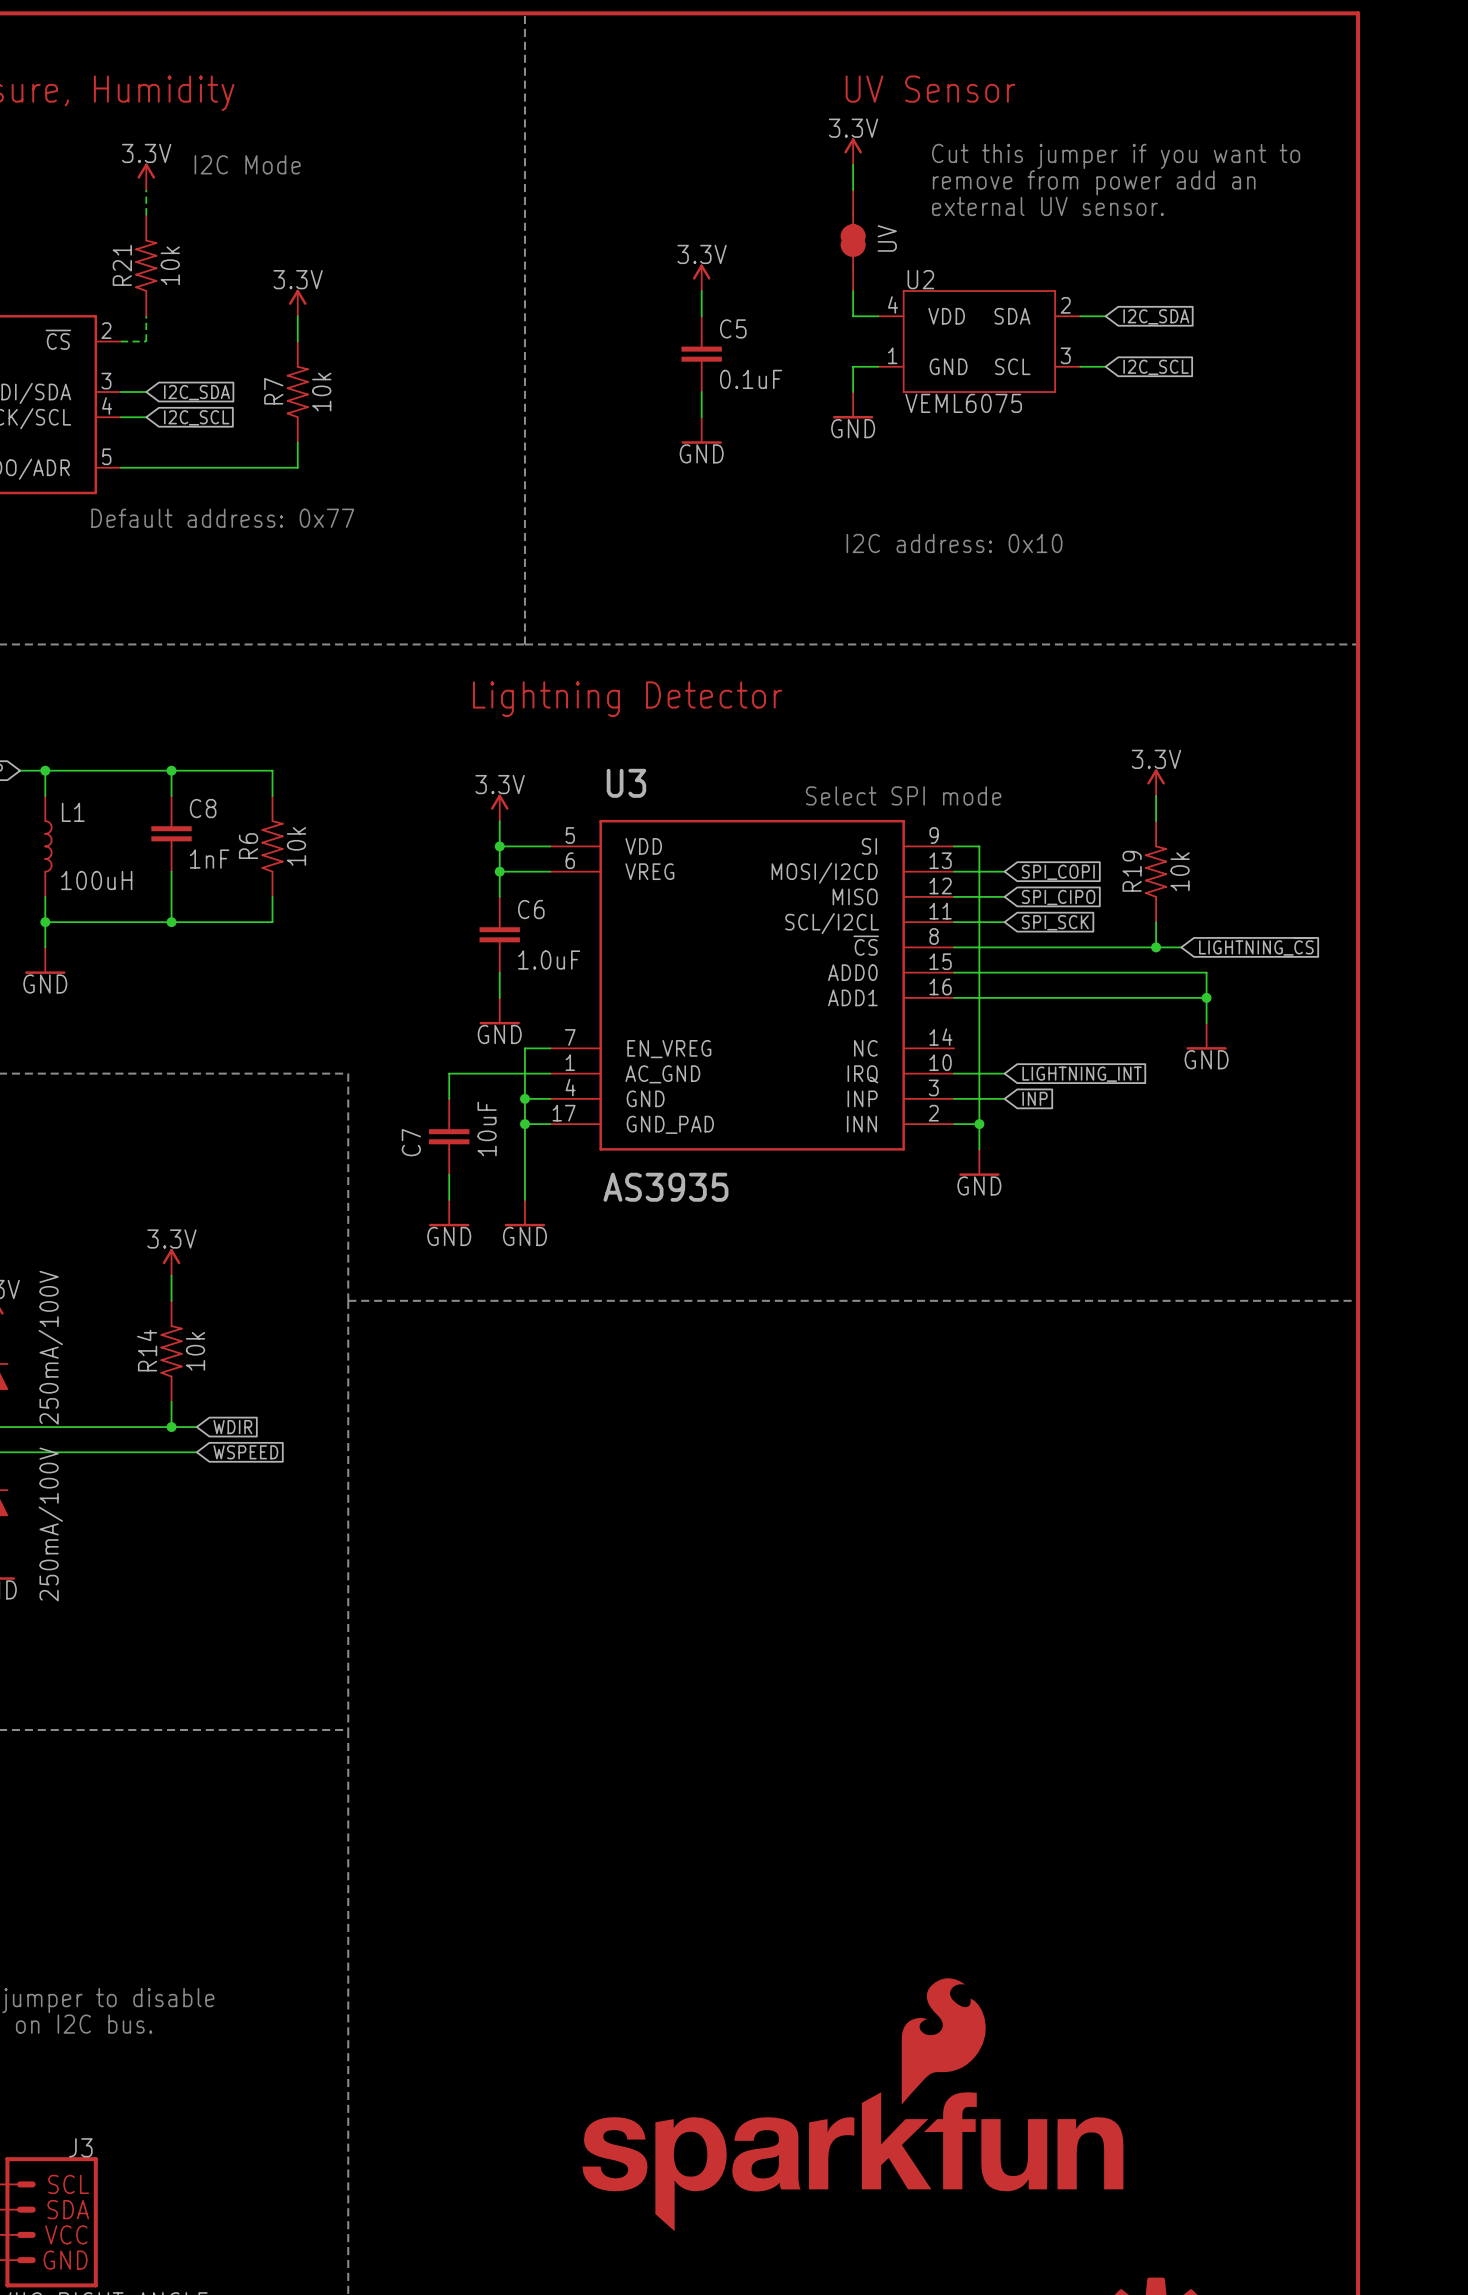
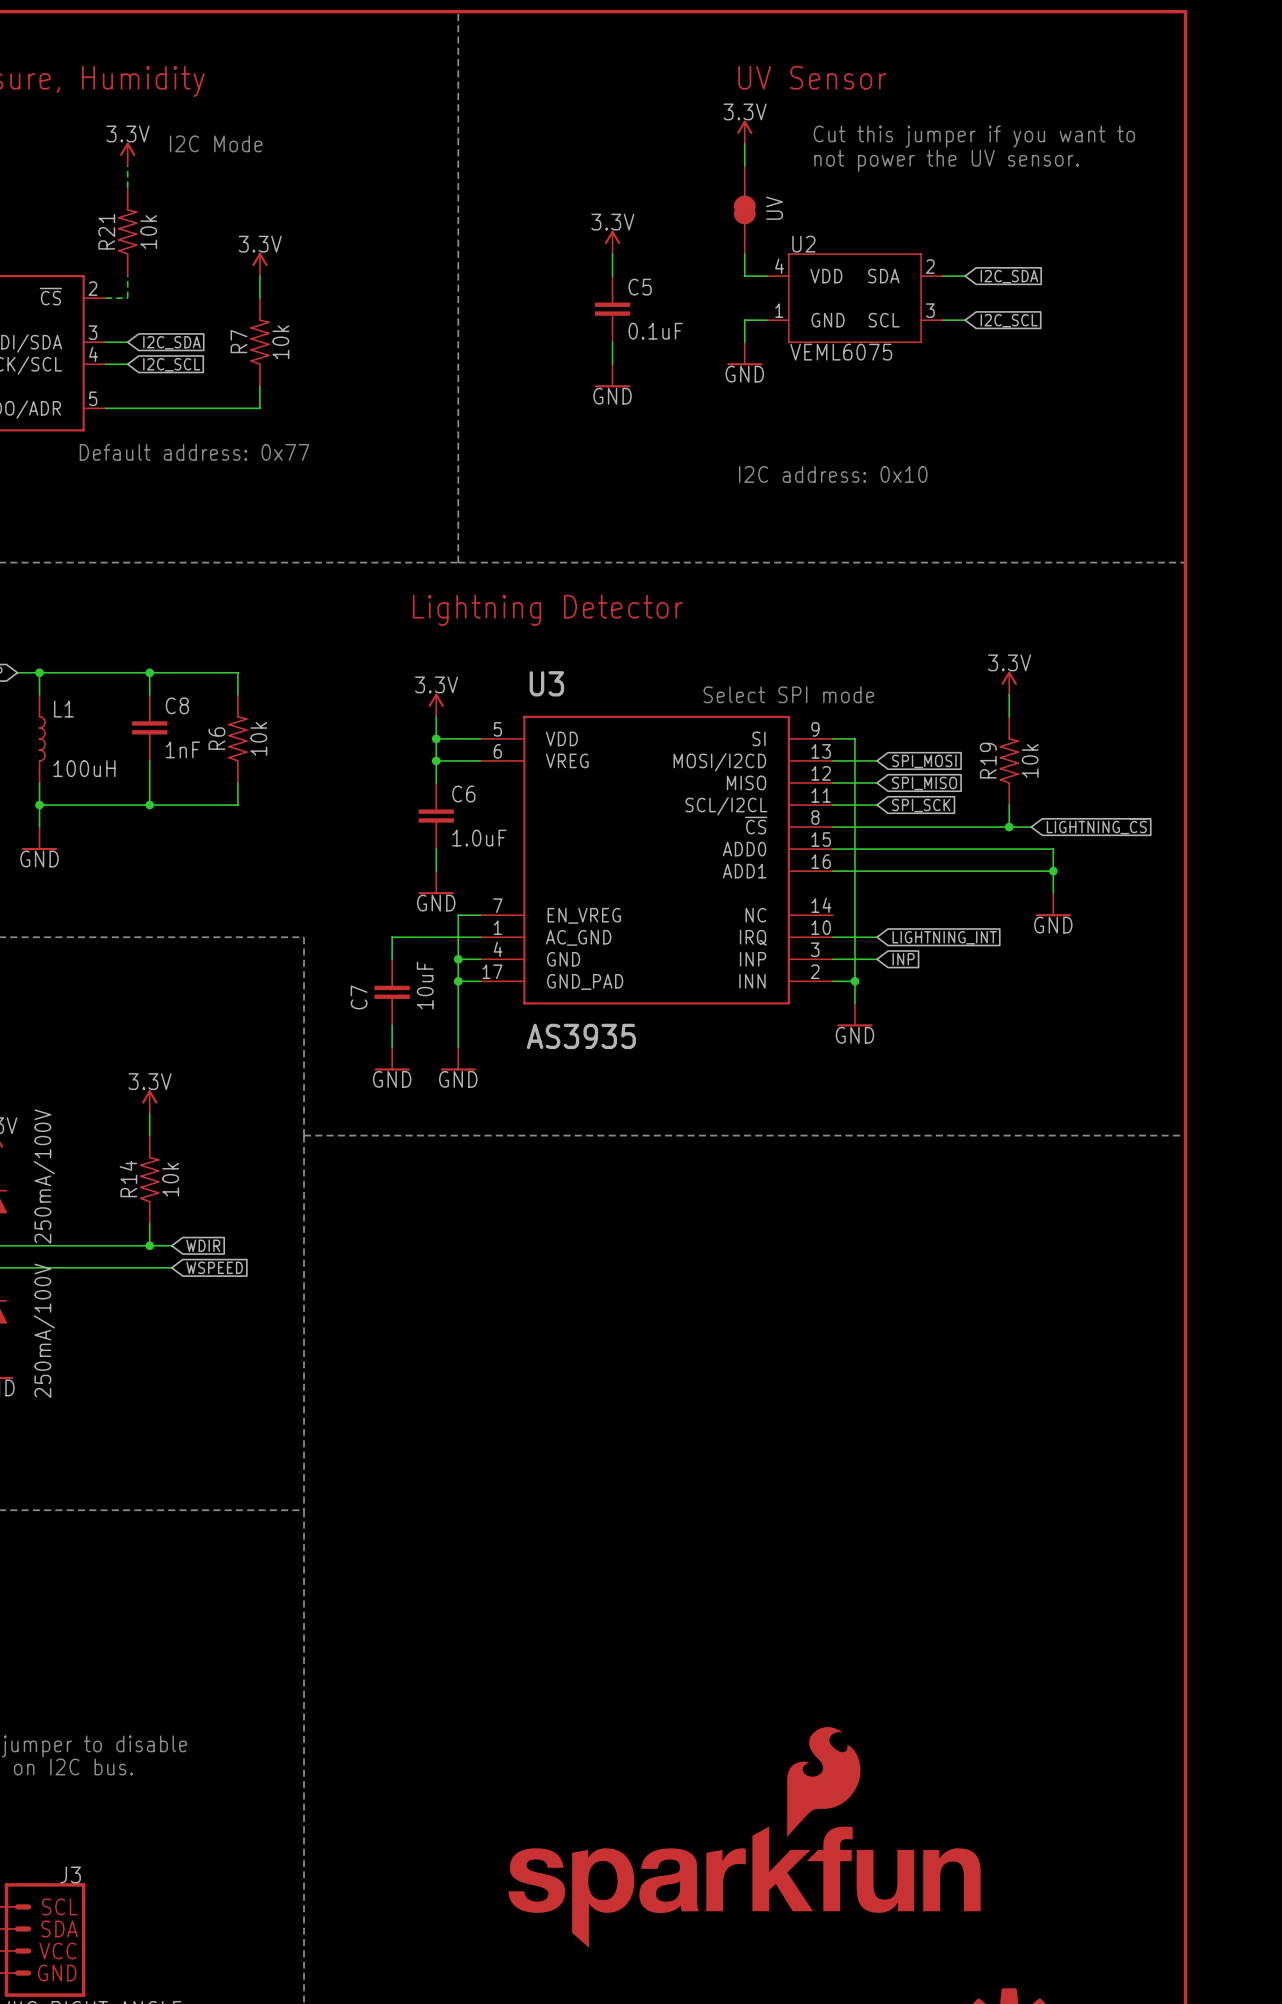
text: remove from power add an (1094, 182) -> not power the UV sensor. (946, 160)
text: external UV sensor. (1047, 206) -> none
global label: SPI_COPI (1058, 872) -> SPI_MOSI (924, 761)
global label: SPI_CIPO (1058, 897) -> SPI_MISO (924, 783)

